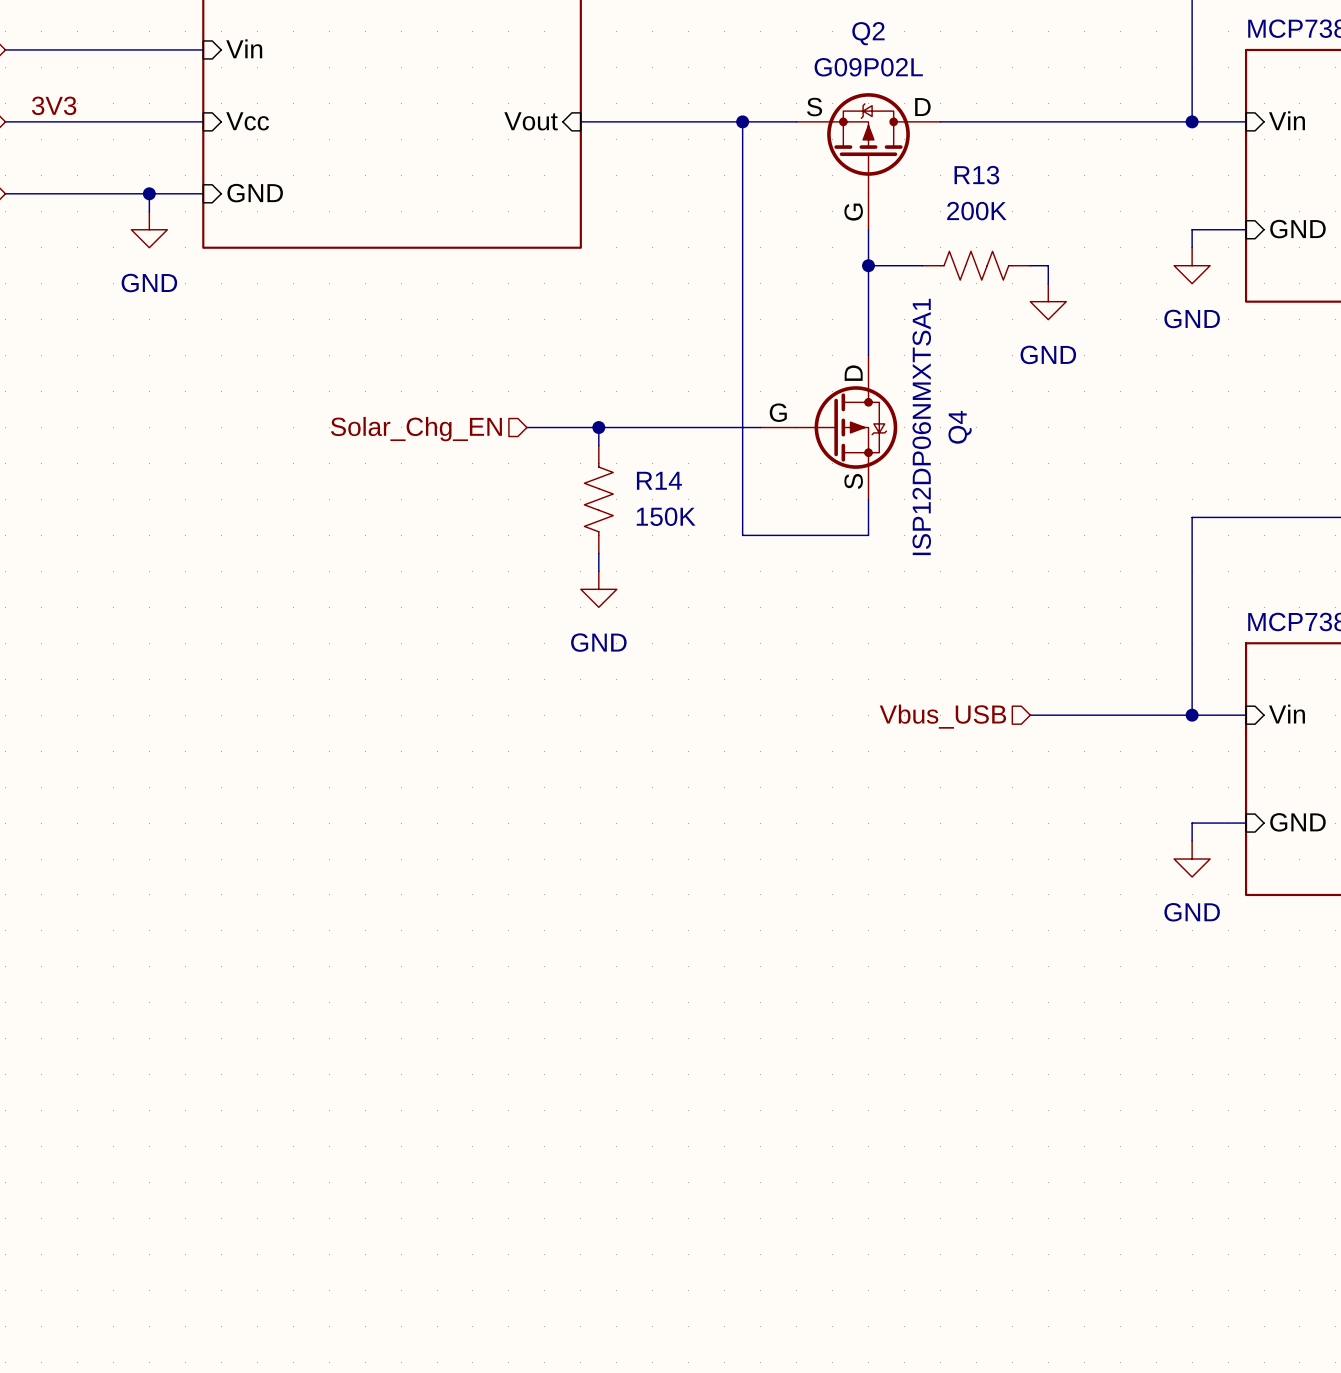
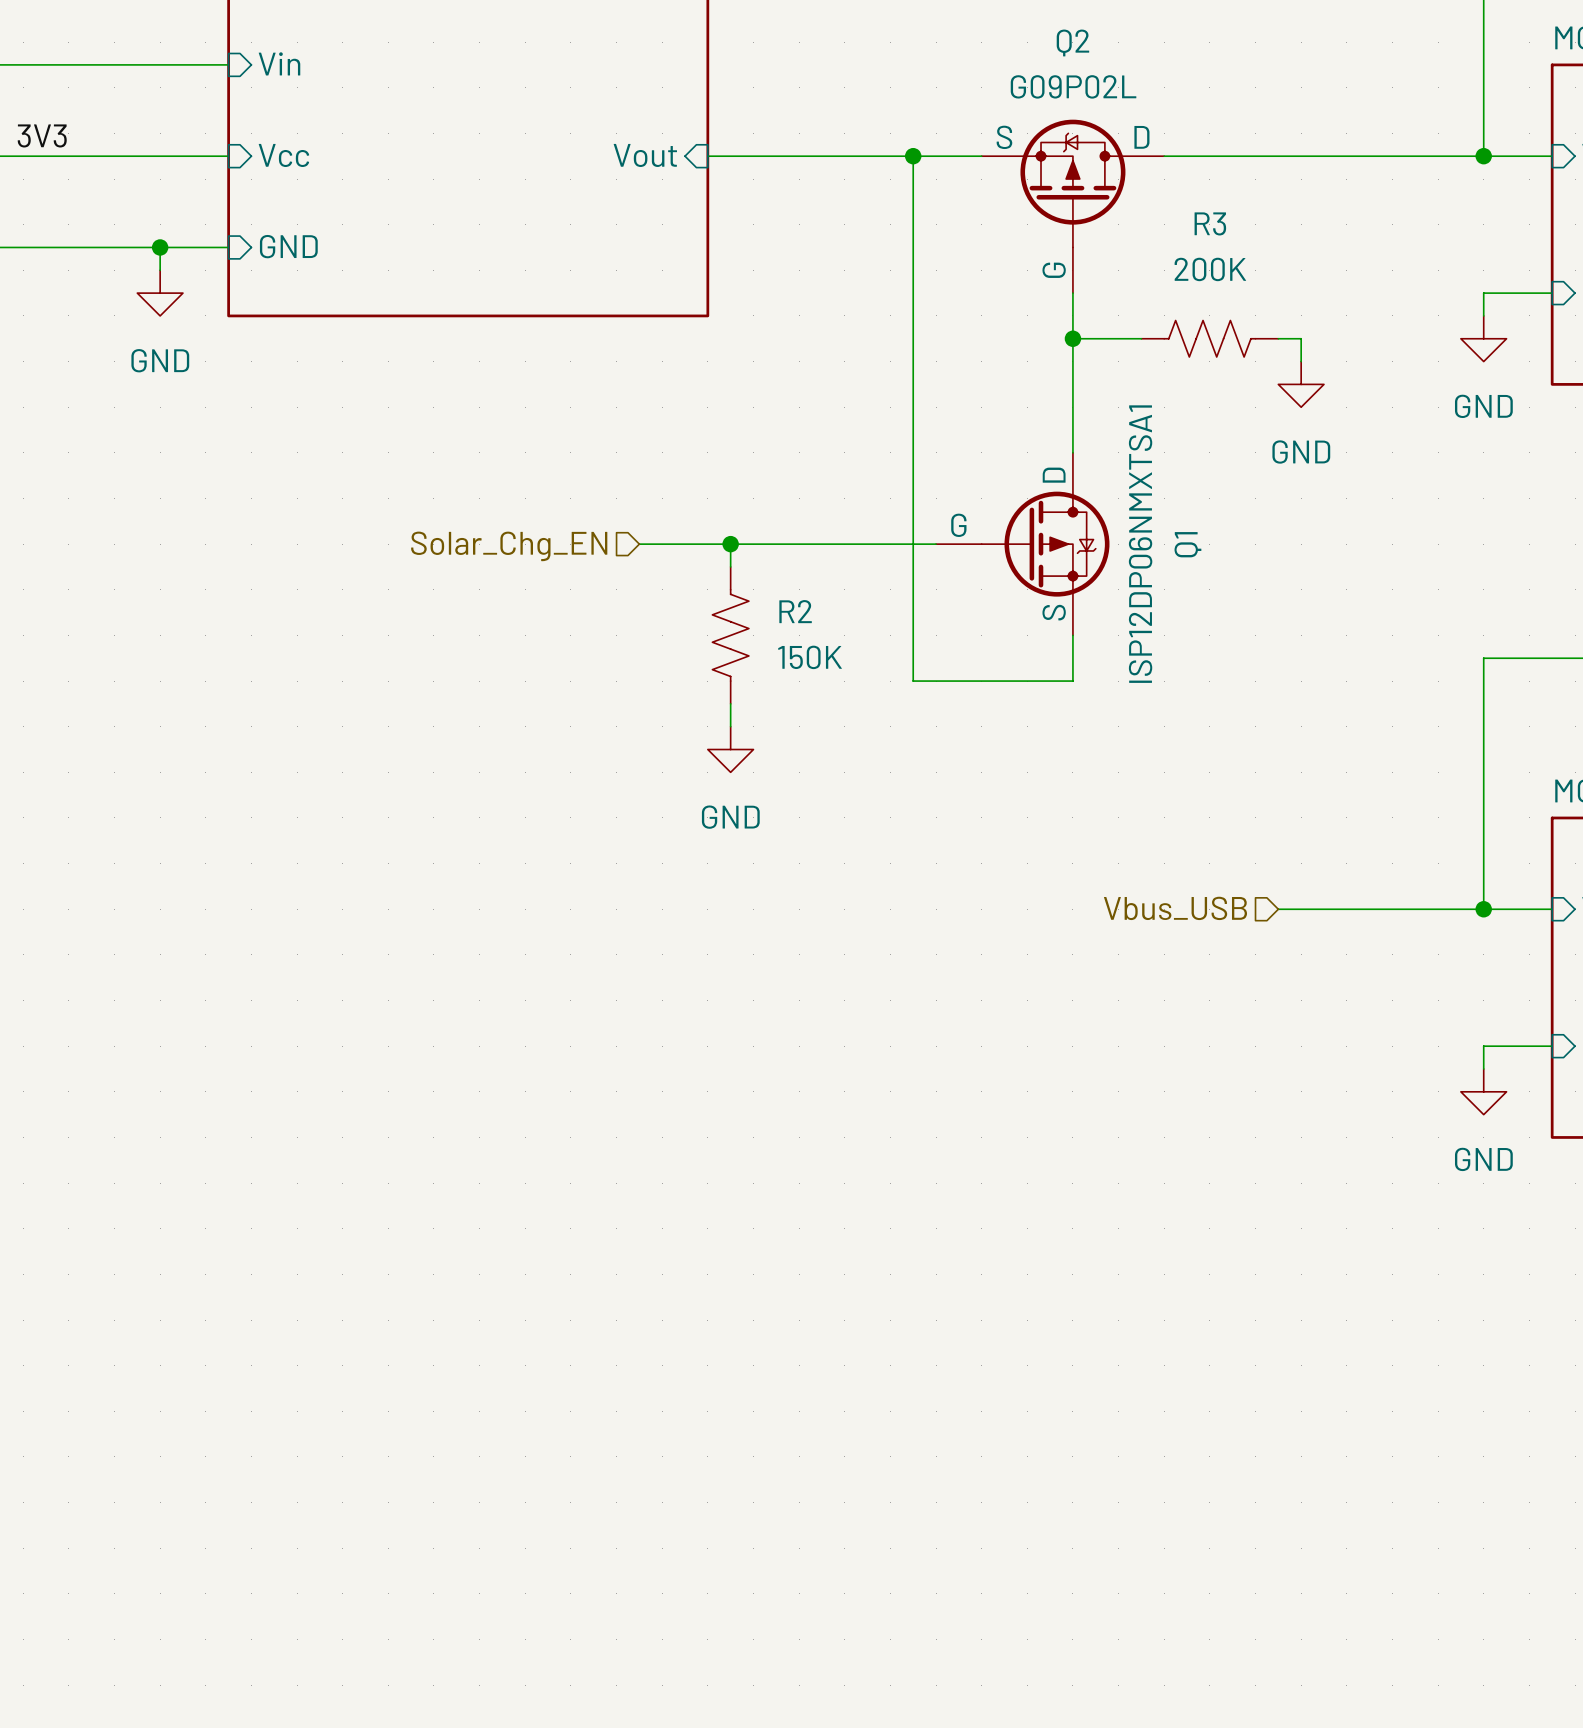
R13 name: R13 (976, 175) -> R3 (1210, 223)
Q4 name: Q4 (960, 427) -> Q1 (1187, 544)
R14 name: R14 (659, 480) -> R2 (795, 611)

